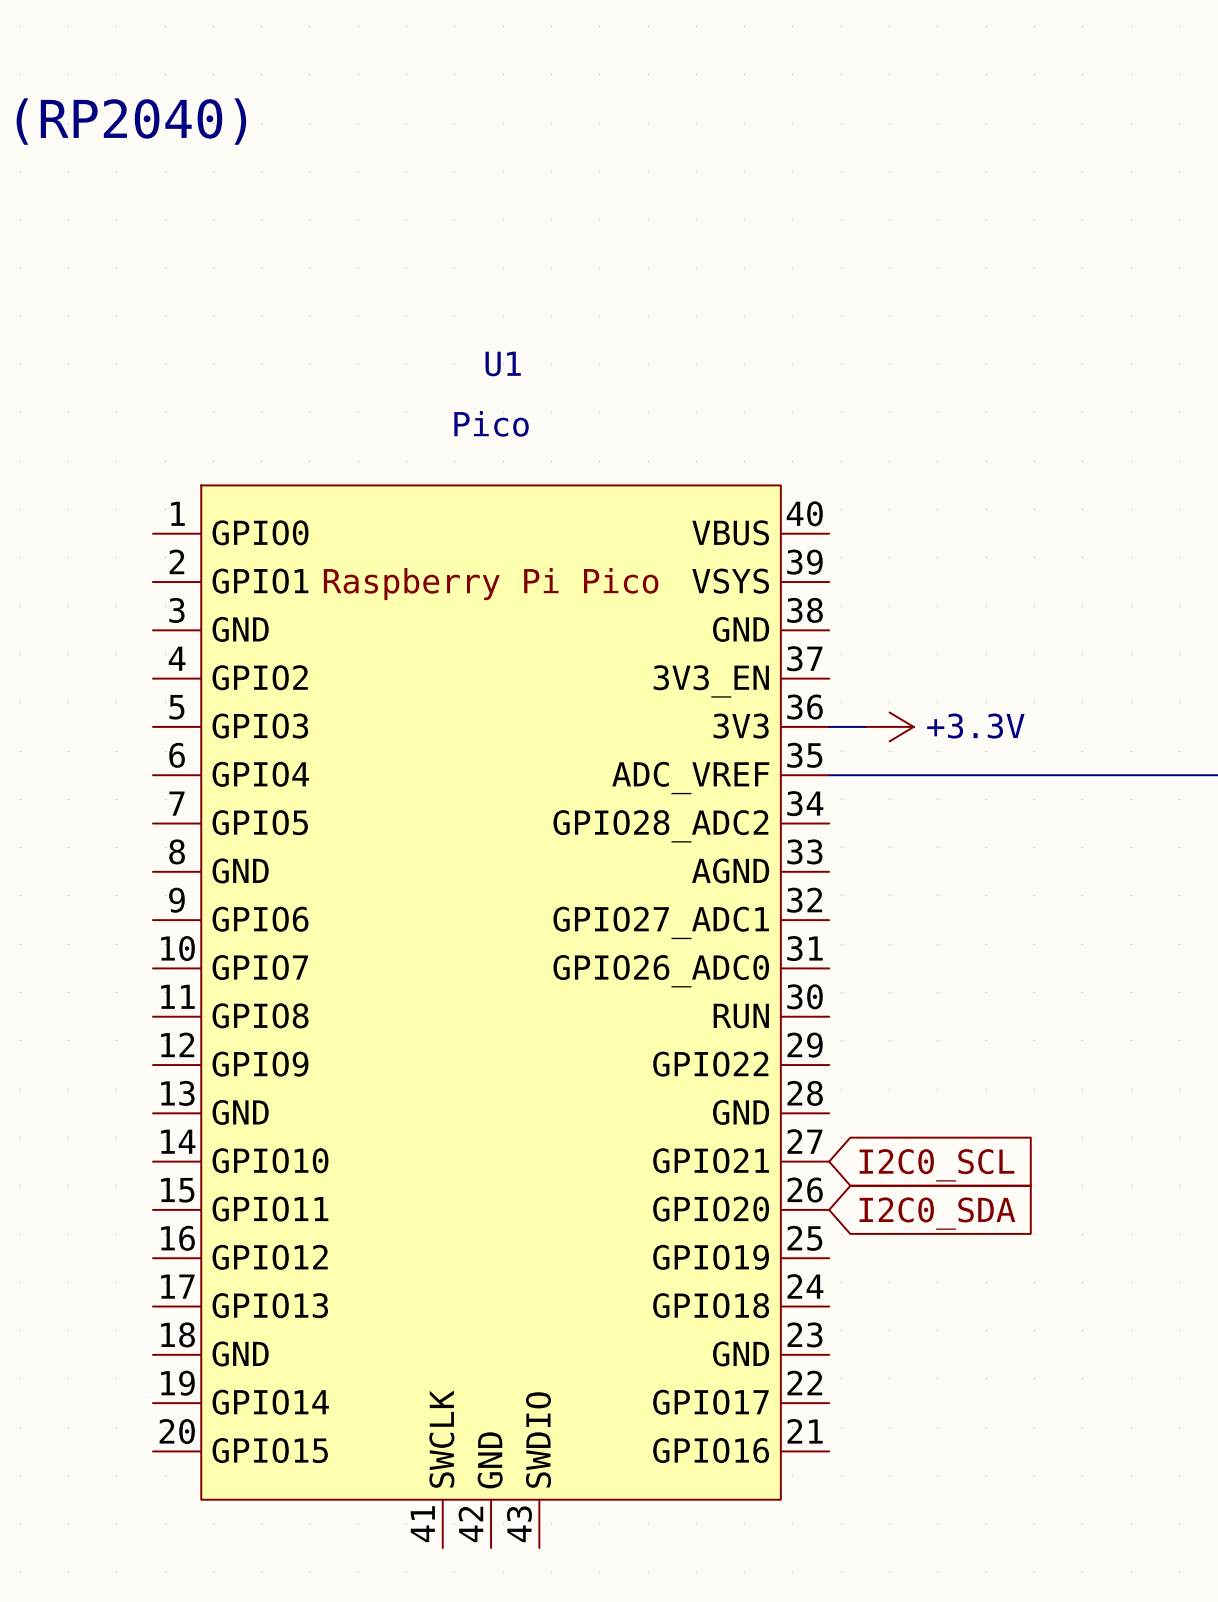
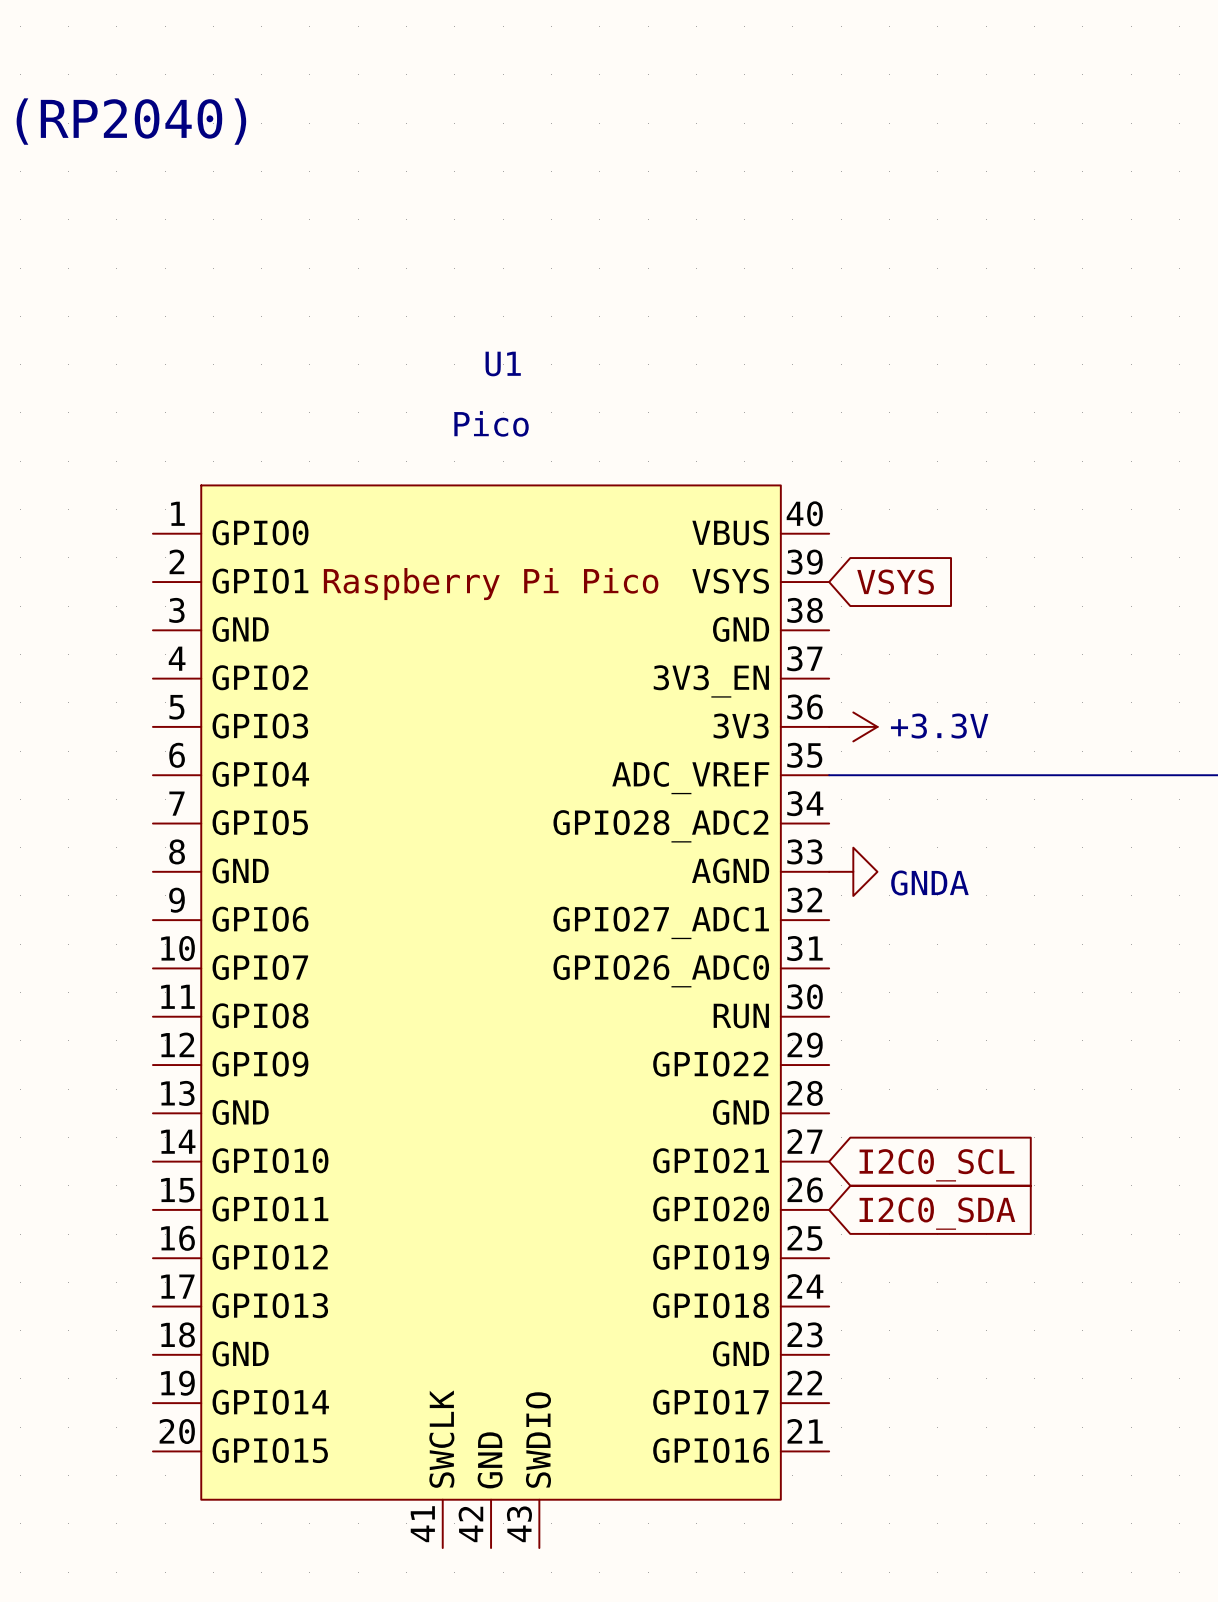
global label: none -> VSYS (895, 582)
power symbol position: +3.3V (889, 726) -> +3.3V (853, 726)
power symbol: none -> GNDA (853, 871)

